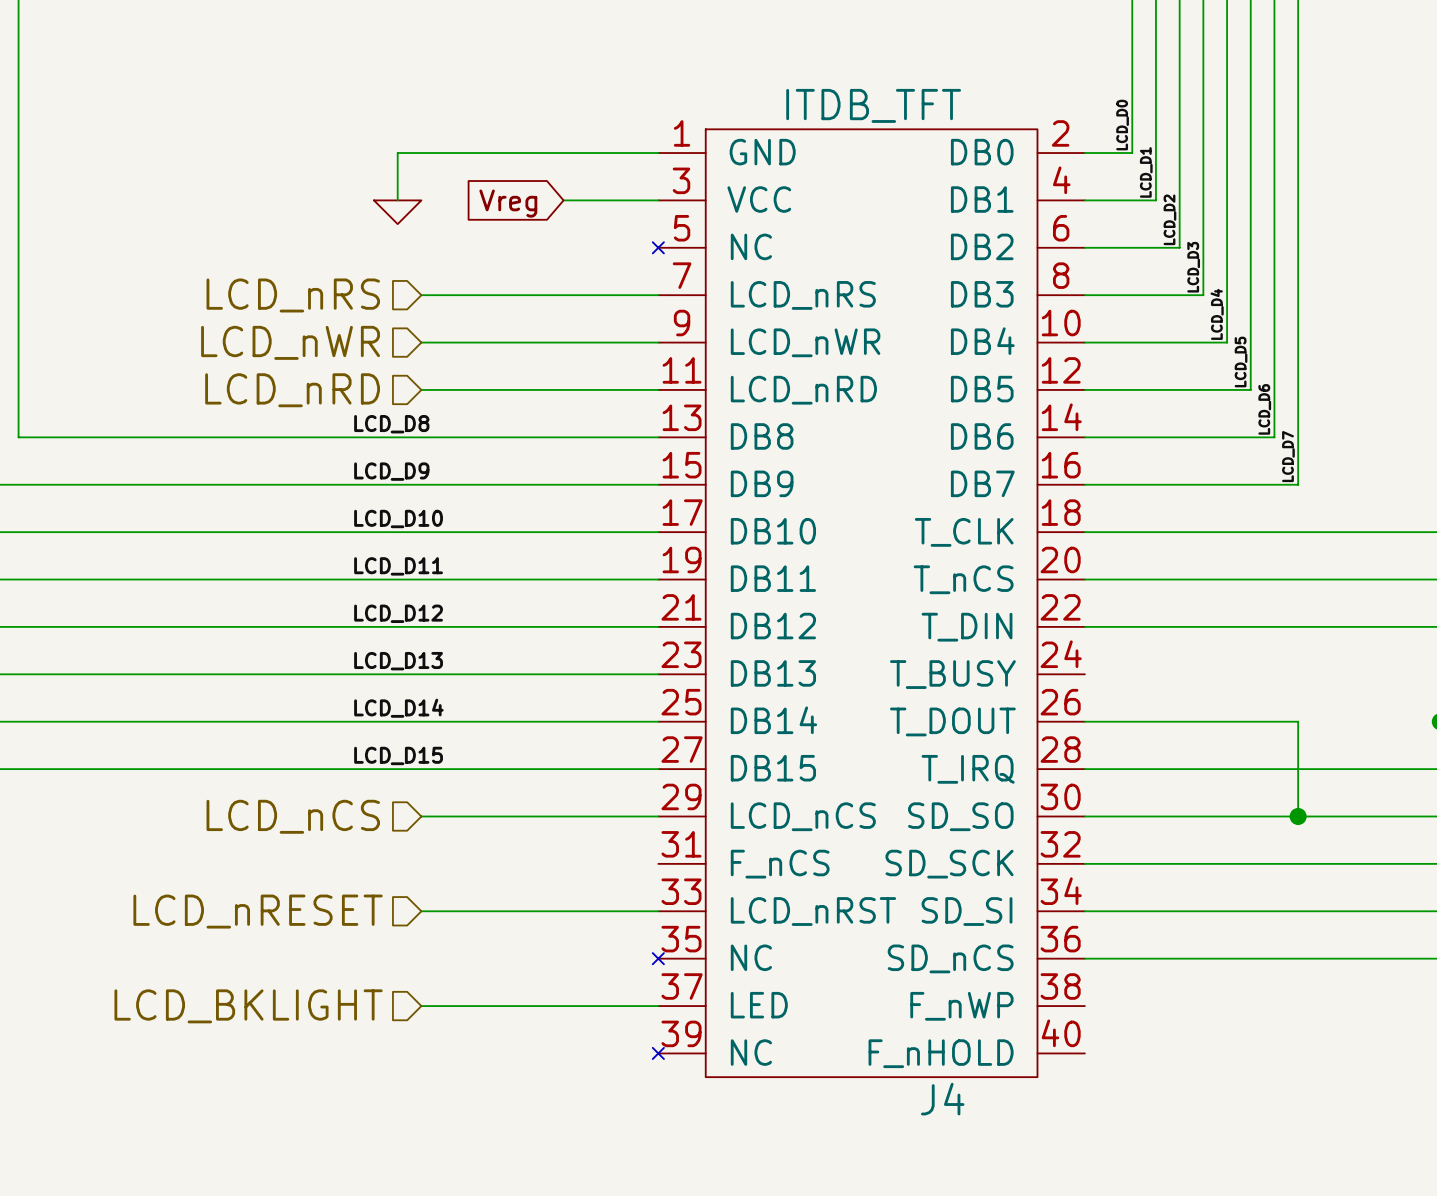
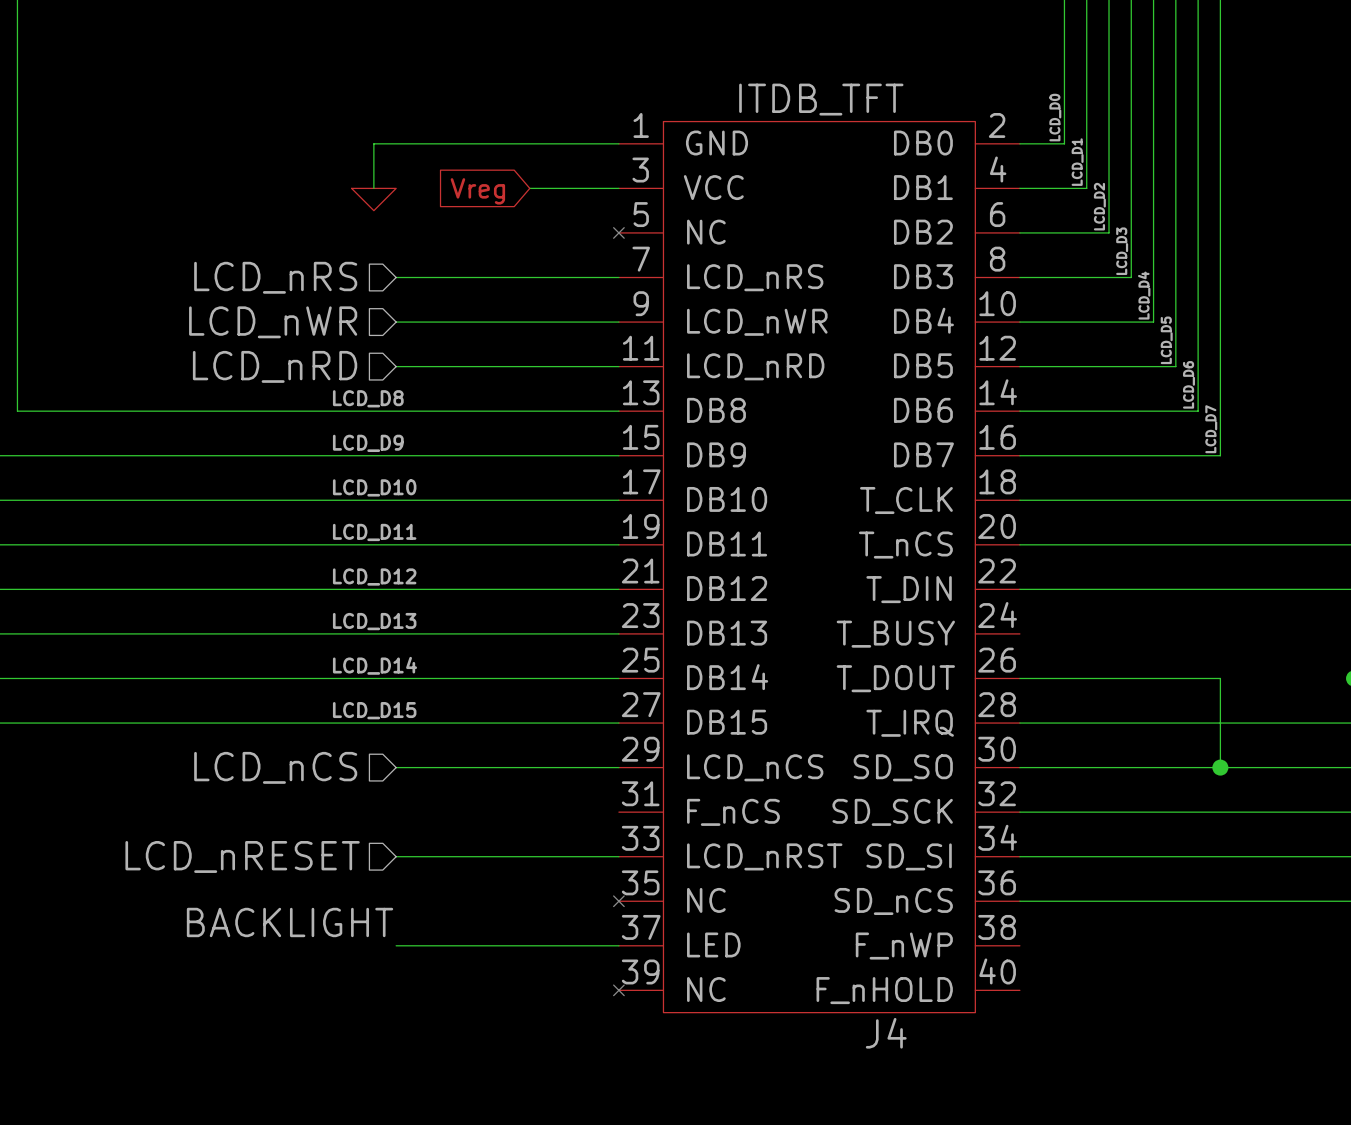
label: none -> BACKLIGHT (290, 922)
hierarchical label: LCD_BKLIGHT (248, 1006) -> none

